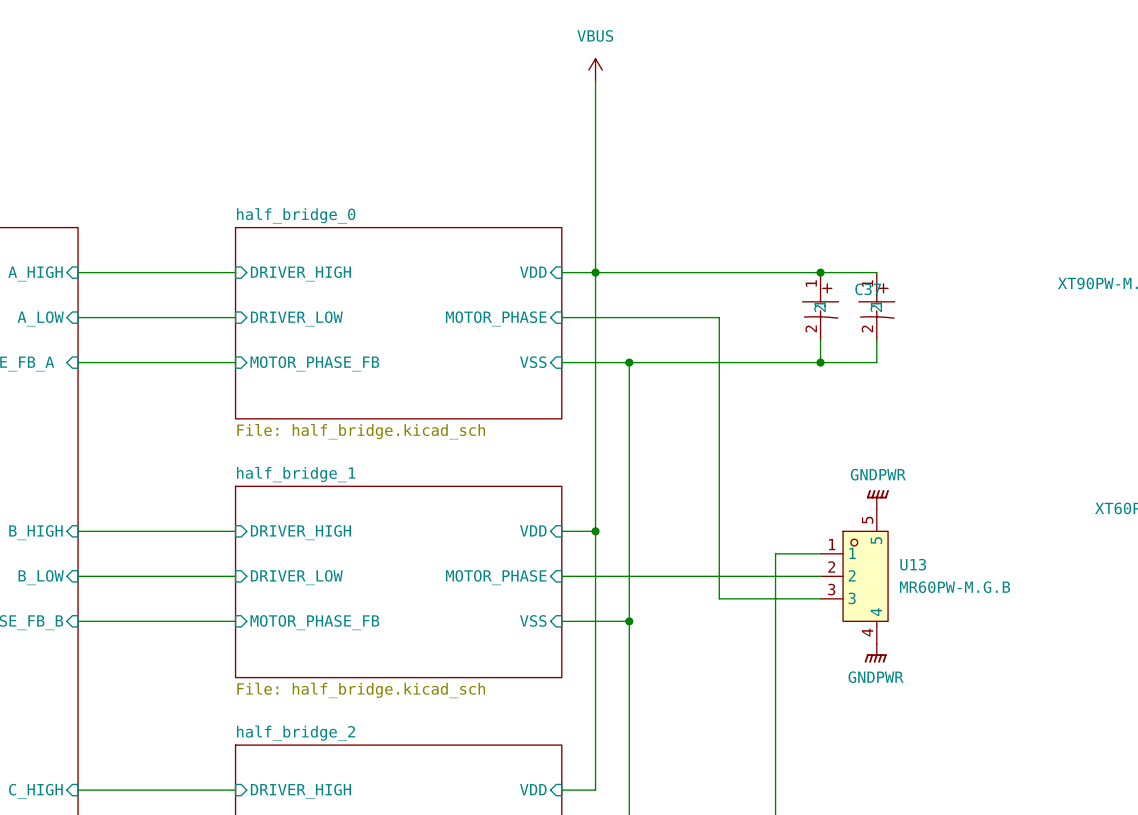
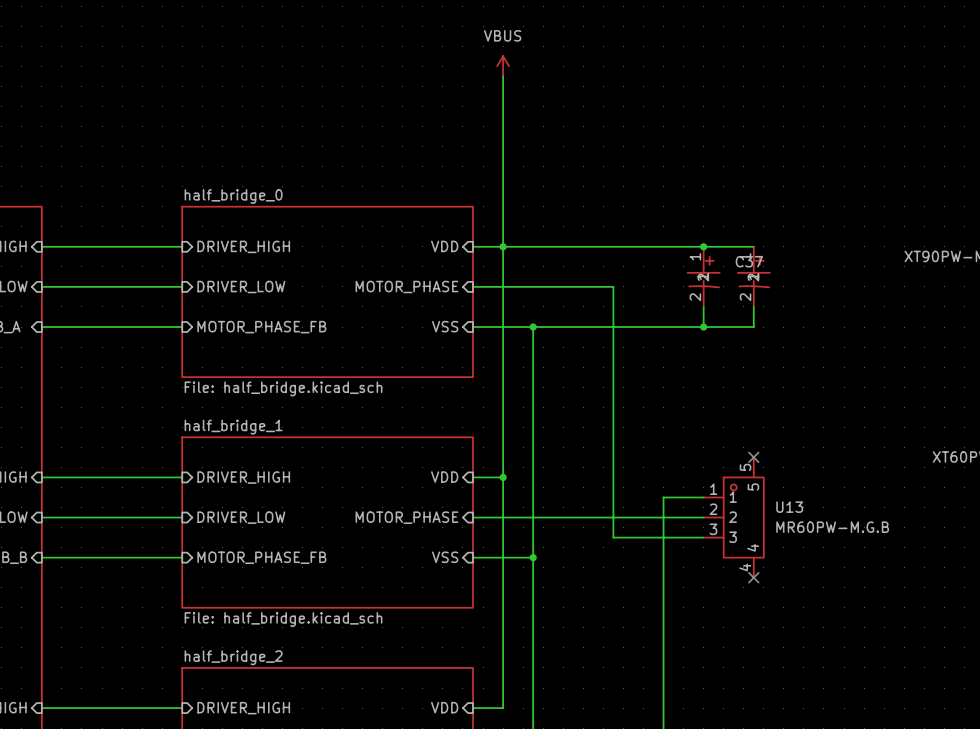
power symbol: GNDPWR (877, 499) -> none
no-connect mark: none -> (753, 457)
no-connect mark: none -> (753, 577)
power symbol: GNDPWR (875, 653) -> none

